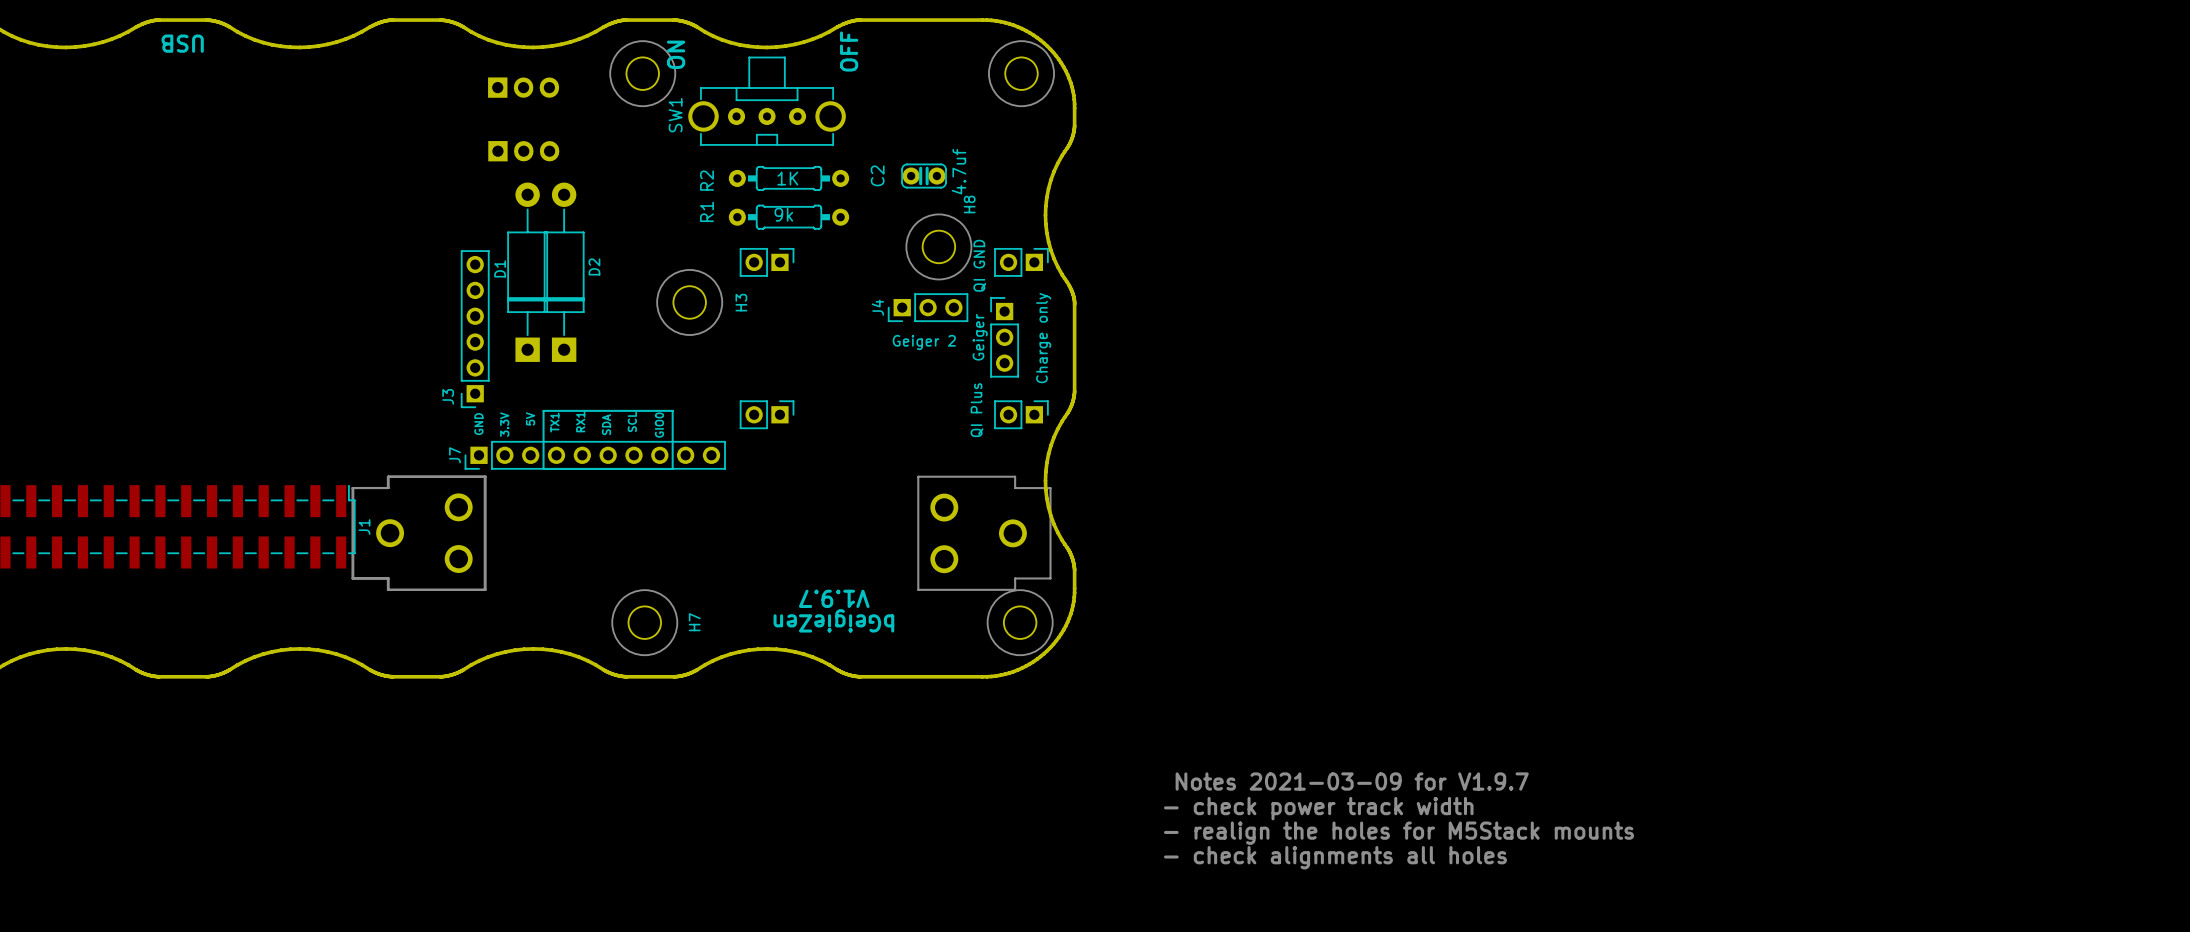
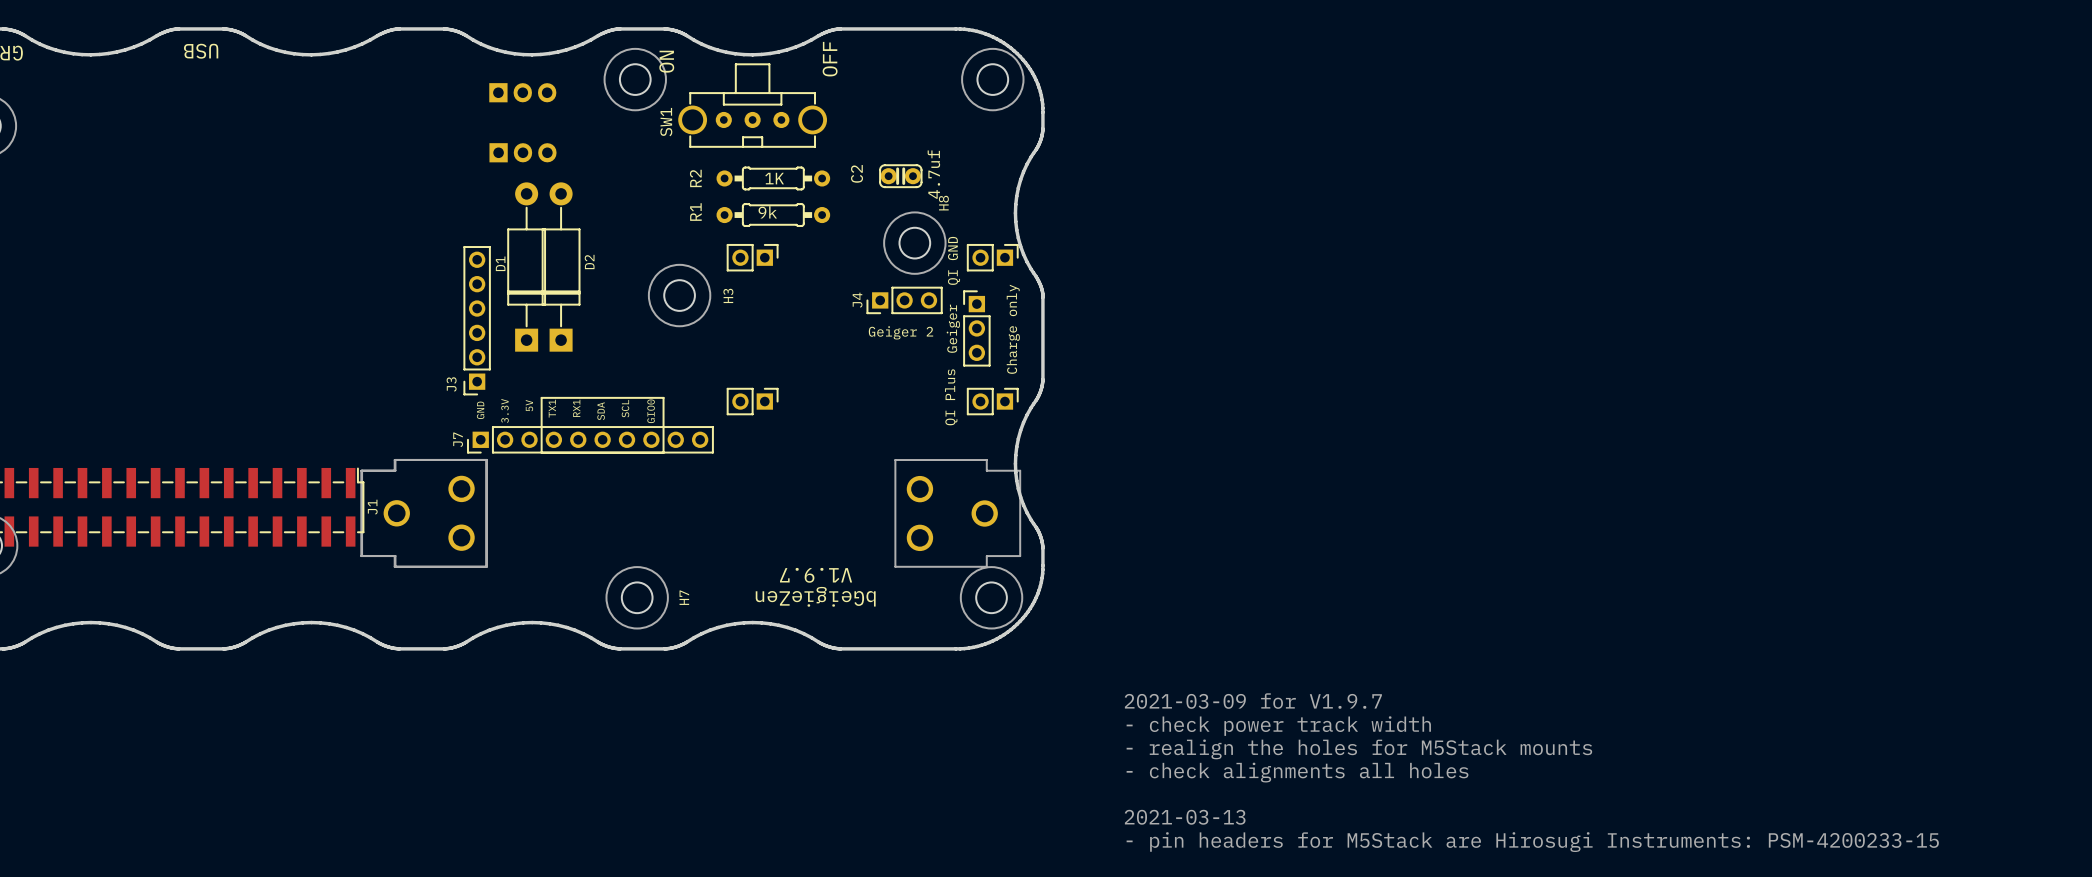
text: none -> 2021-03-09 for V1.9.7 (1253, 701)
text: none -> - check power track width (1278, 726)
text: Notes 2021-03-09 for V1.9.7 (1352, 781) -> - realign the holes for M5Stack mounts (1359, 749)
text: - check power track width (1318, 808) -> - check alignments all holes (1297, 772)
text: - realign the holes for M5Stack mounts (1399, 833) -> none
text: - check alignments all holes (1335, 857) -> 2021-03-13 (1185, 817)
text: none -> - pin headers for M5Stack are Hirosugi Instruments: PSM-4200233-15 (1532, 842)

